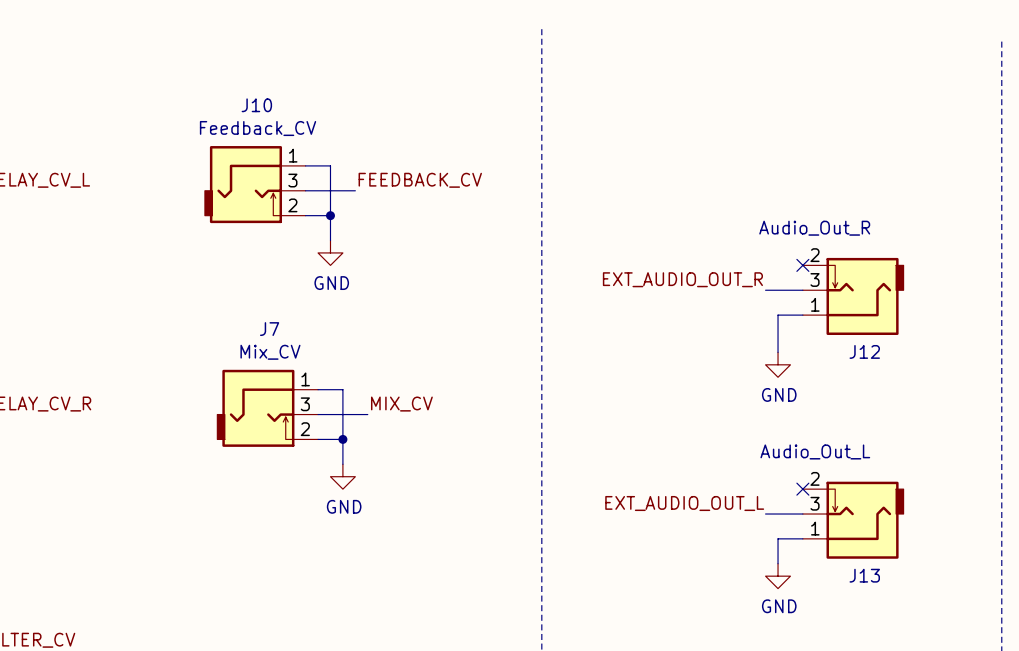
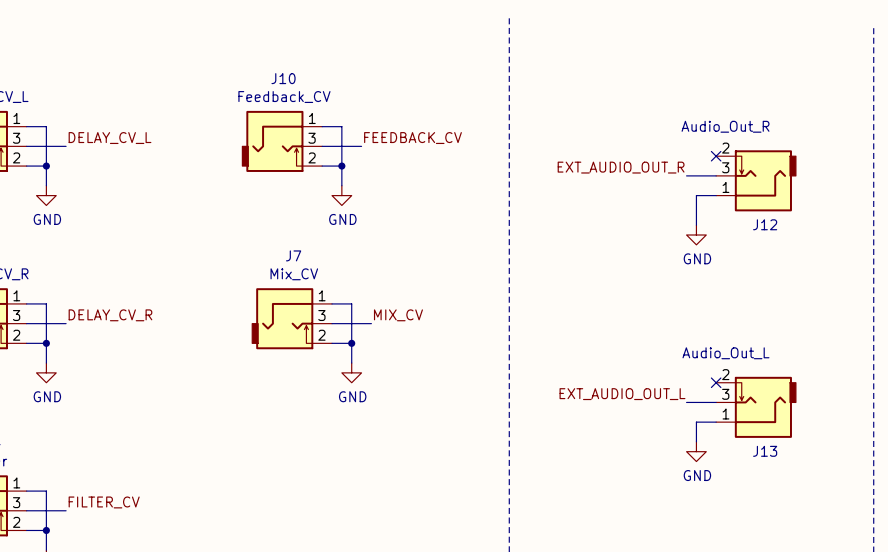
no-connect mark: none -> (716, 156)
no-connect mark: (802, 265) -> none
label position: EXT_AUDIO_OUT_R (682, 279) -> EXT_AUDIO_OUT_R (621, 167)
wire: (765, 290) (802, 290) -> (686, 175) (716, 175)
J12 position: (853, 296) -> (756, 180)
wire: (802, 315) (778, 315) (778, 352) -> (716, 195) (696, 195) (696, 225)
power symbol position: GND (778, 364) -> GND (696, 235)

